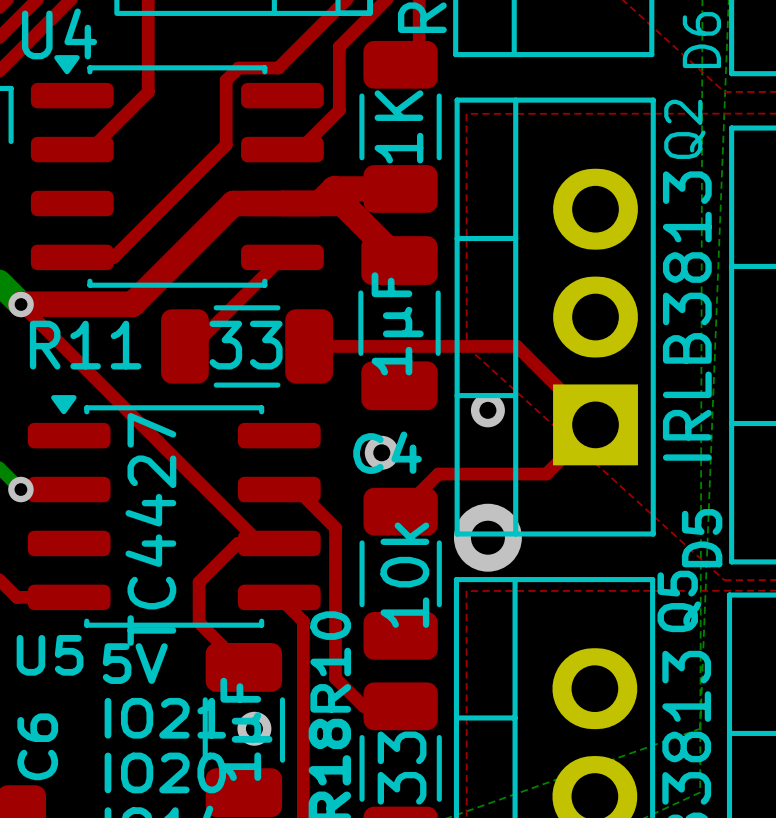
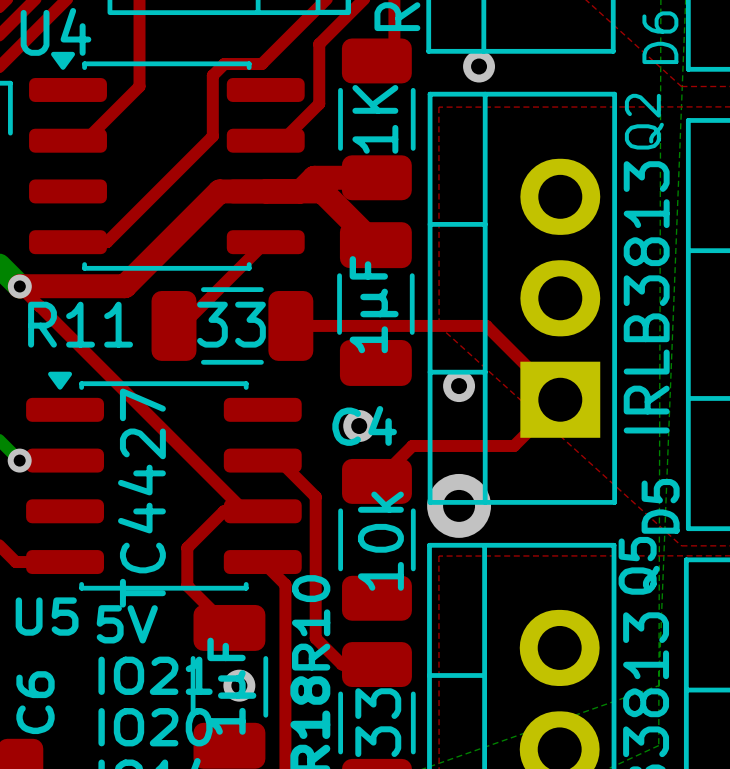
via: none -> (479, 66)

